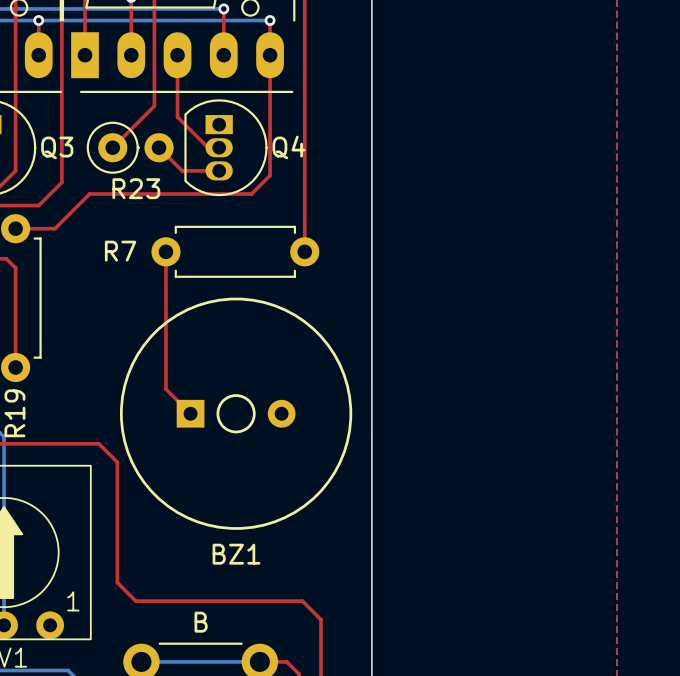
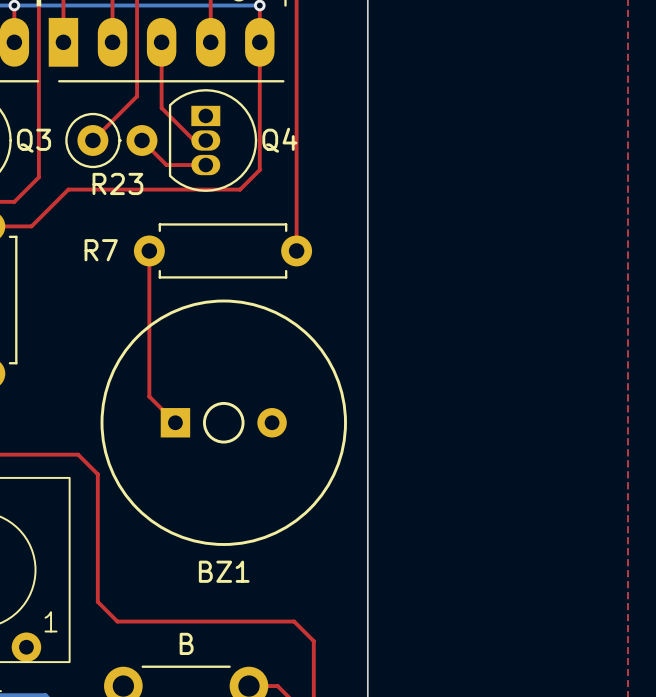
bottom track: (141, 661) (259, 661) -> none

